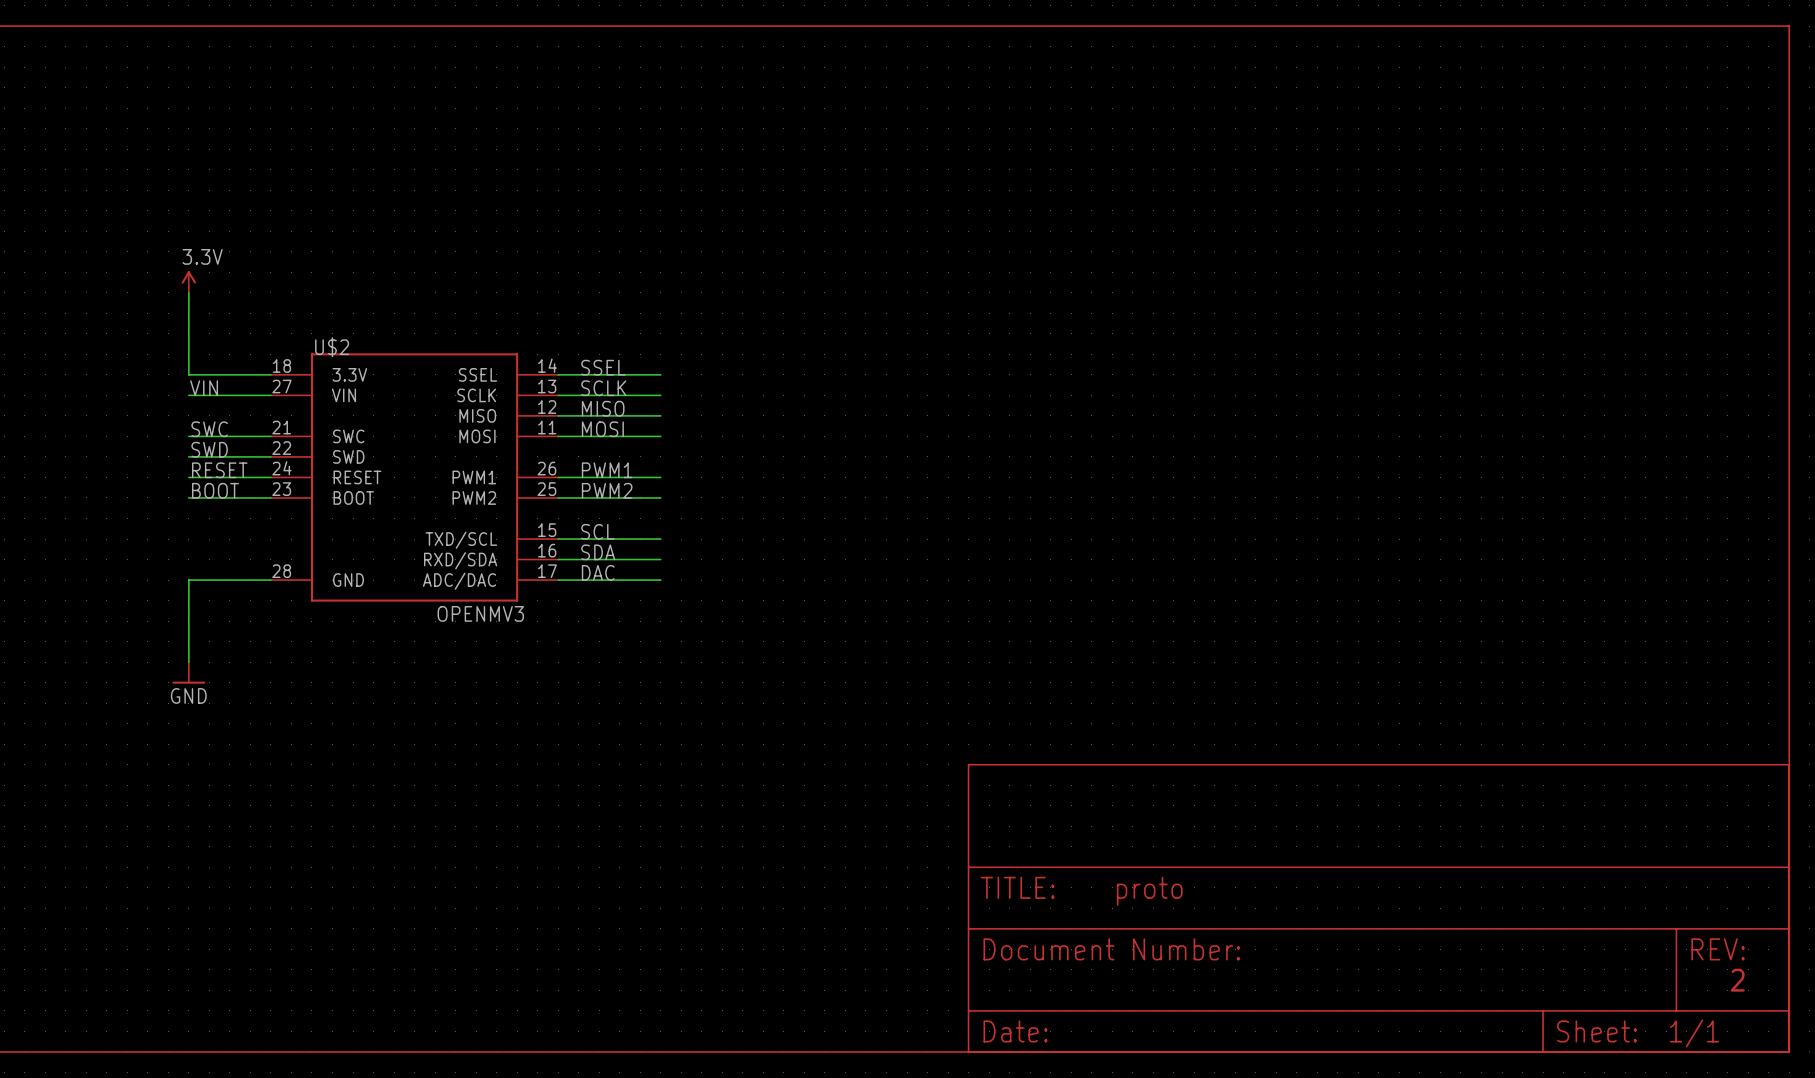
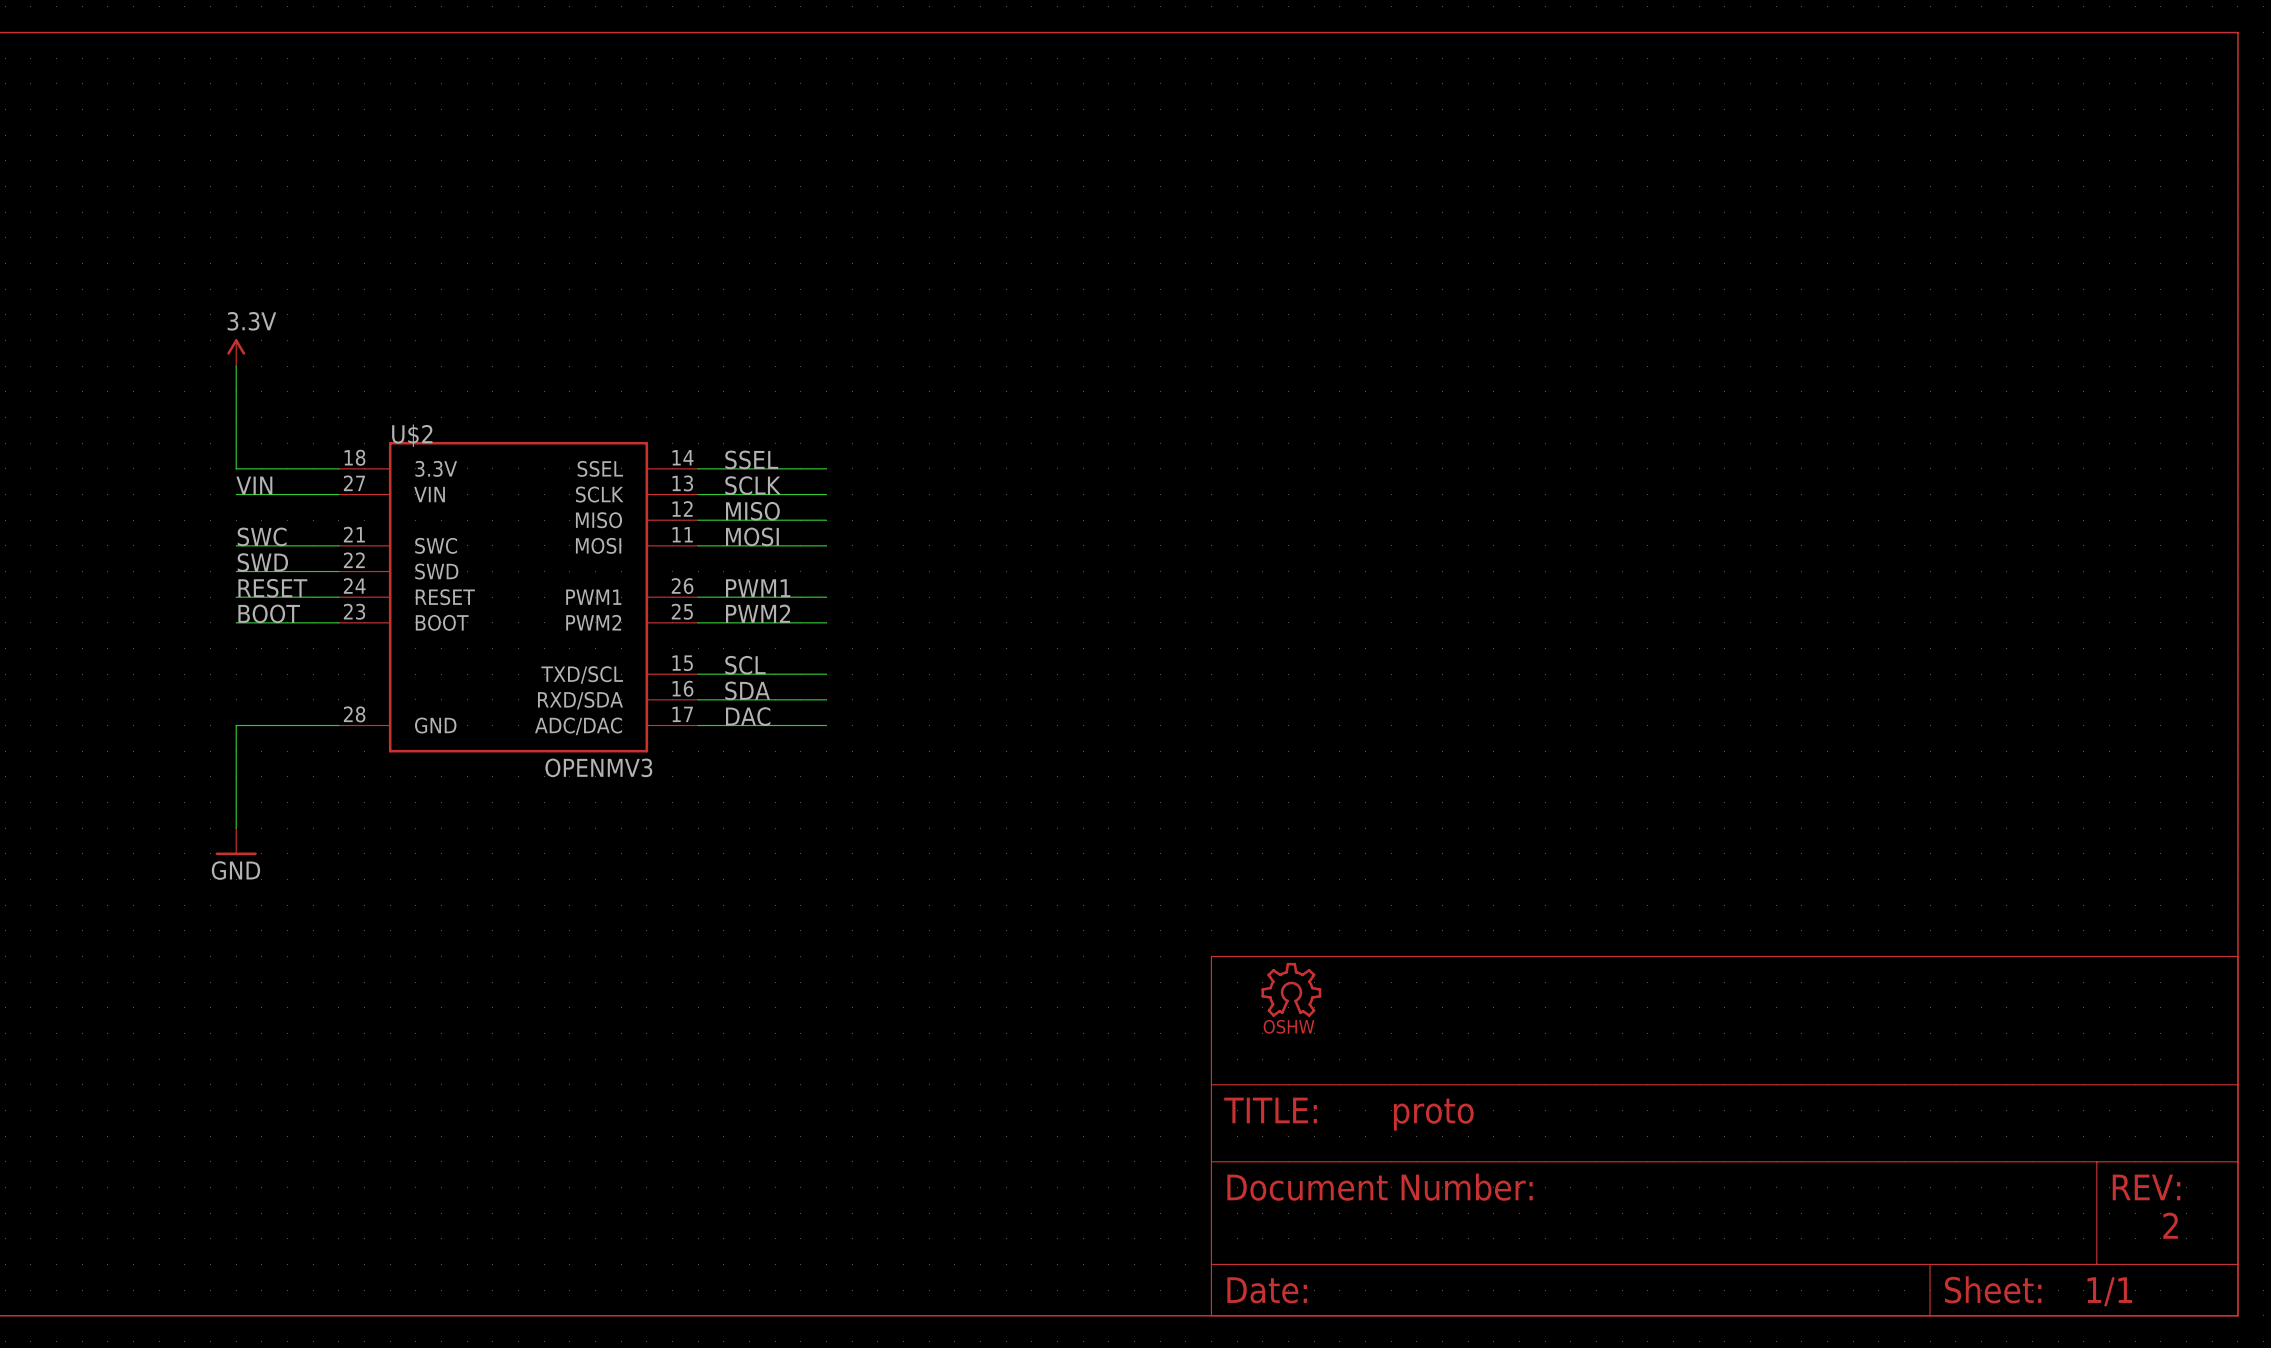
part: none -> (1291, 989)

